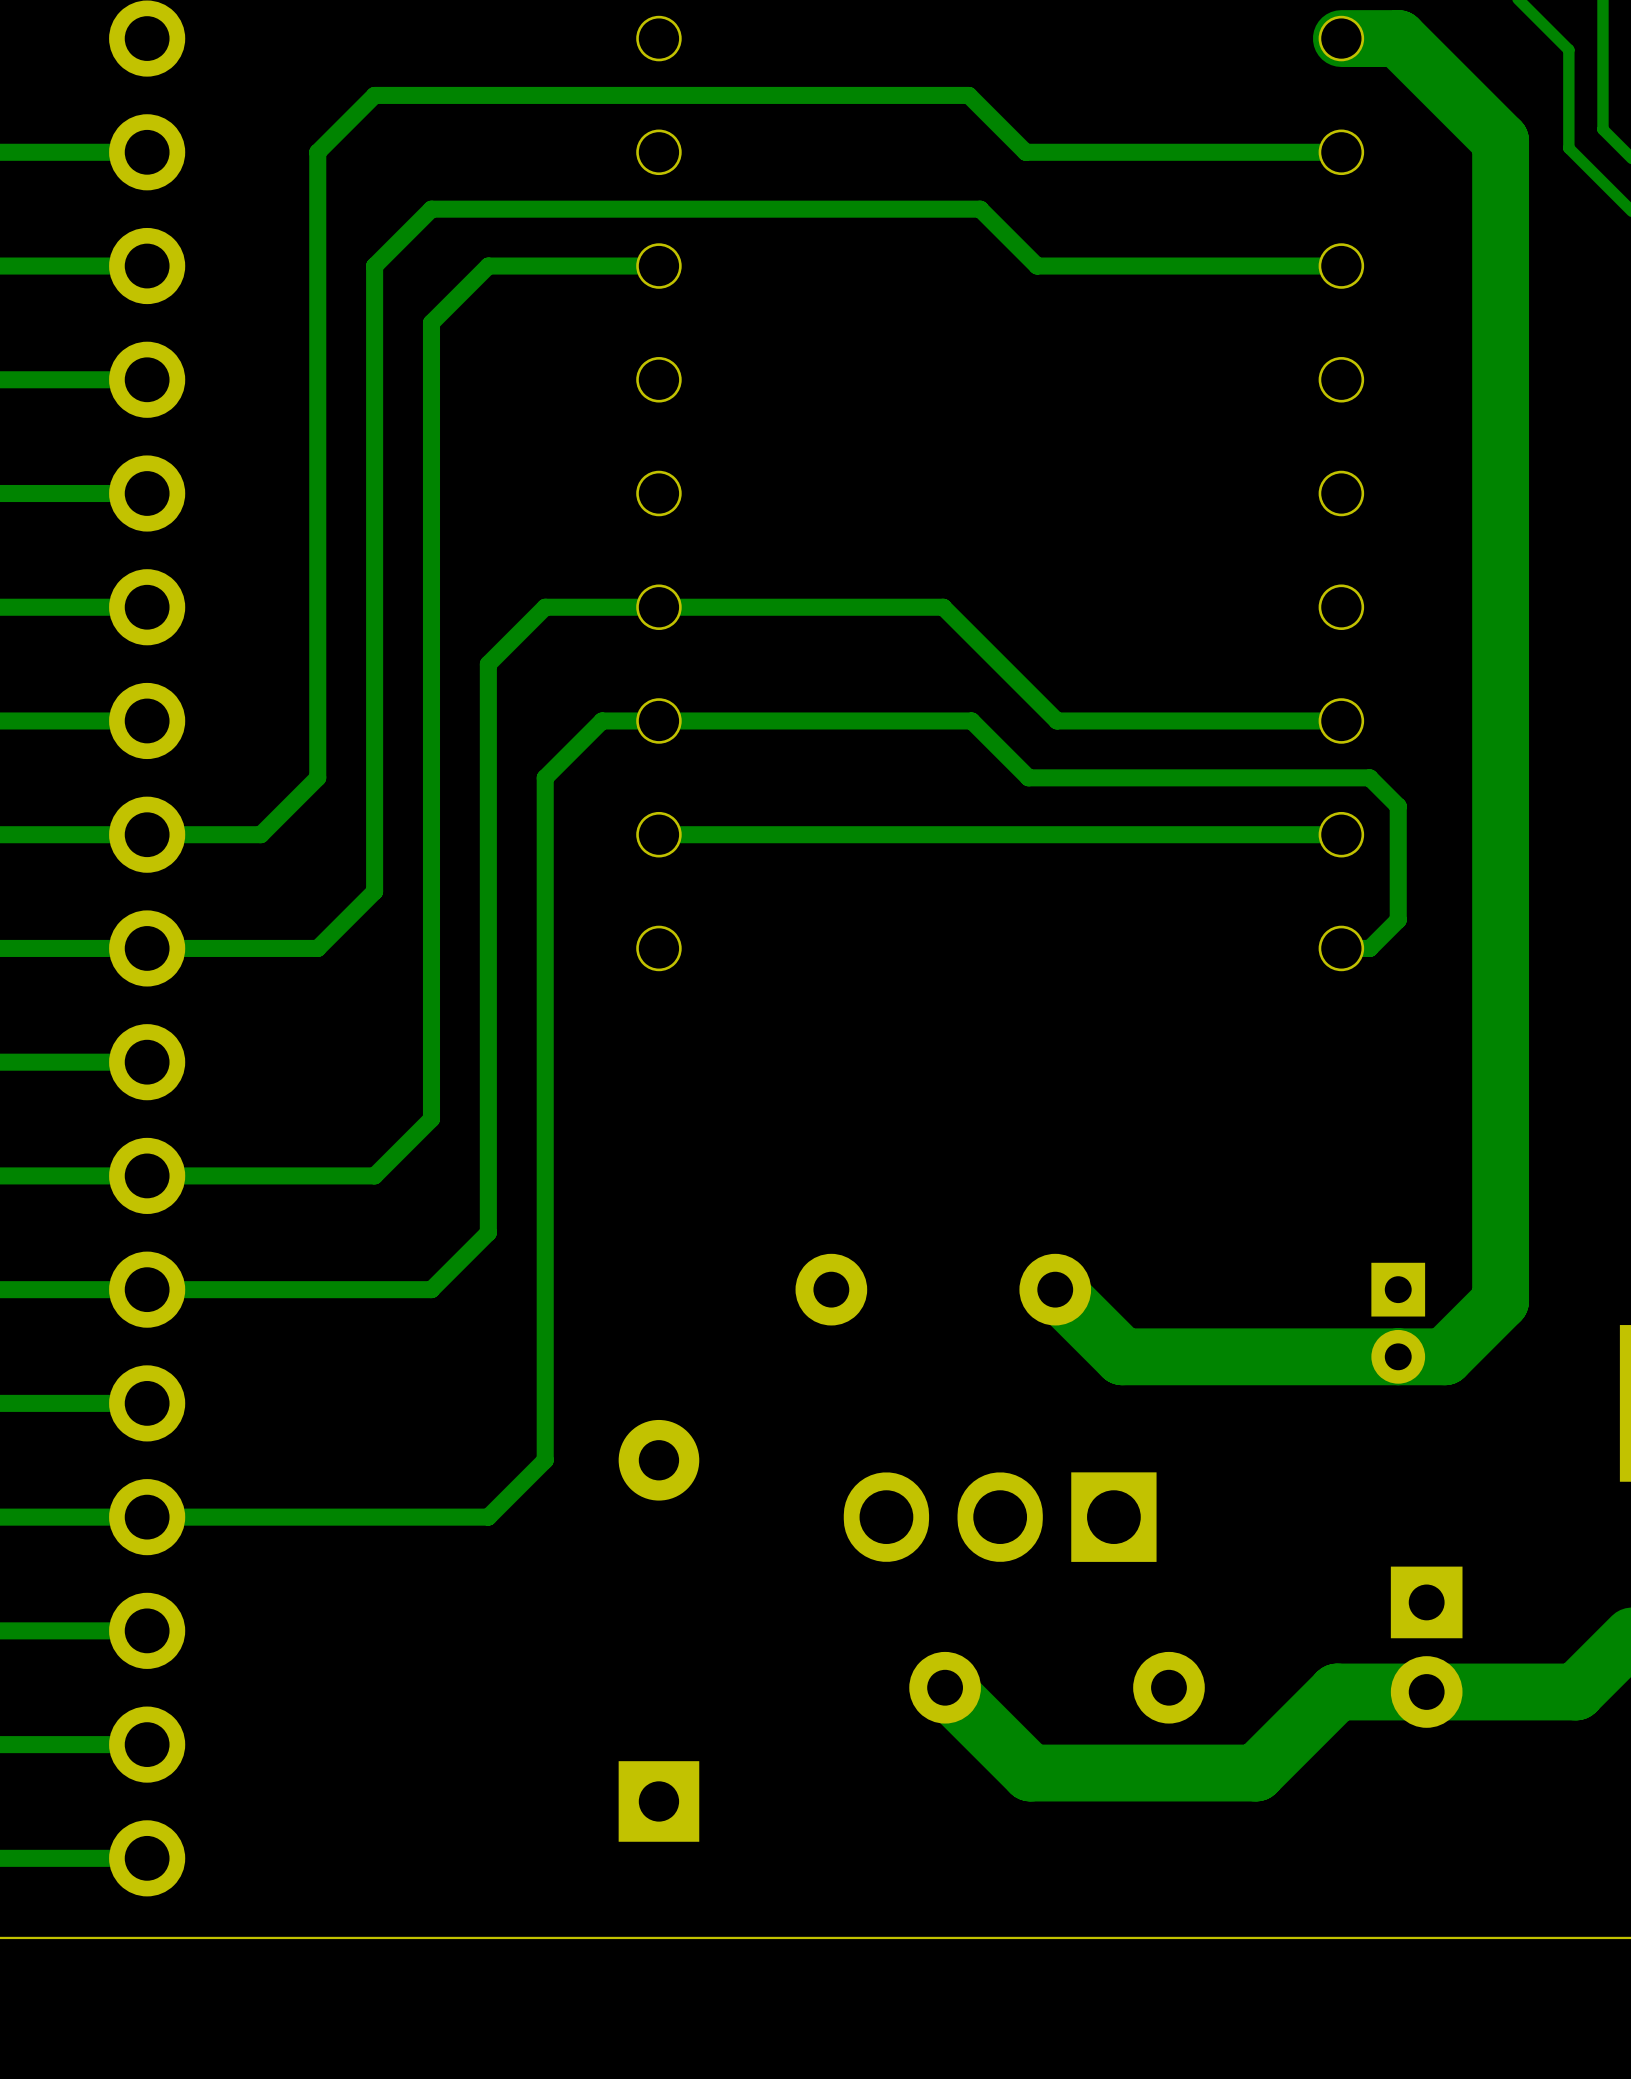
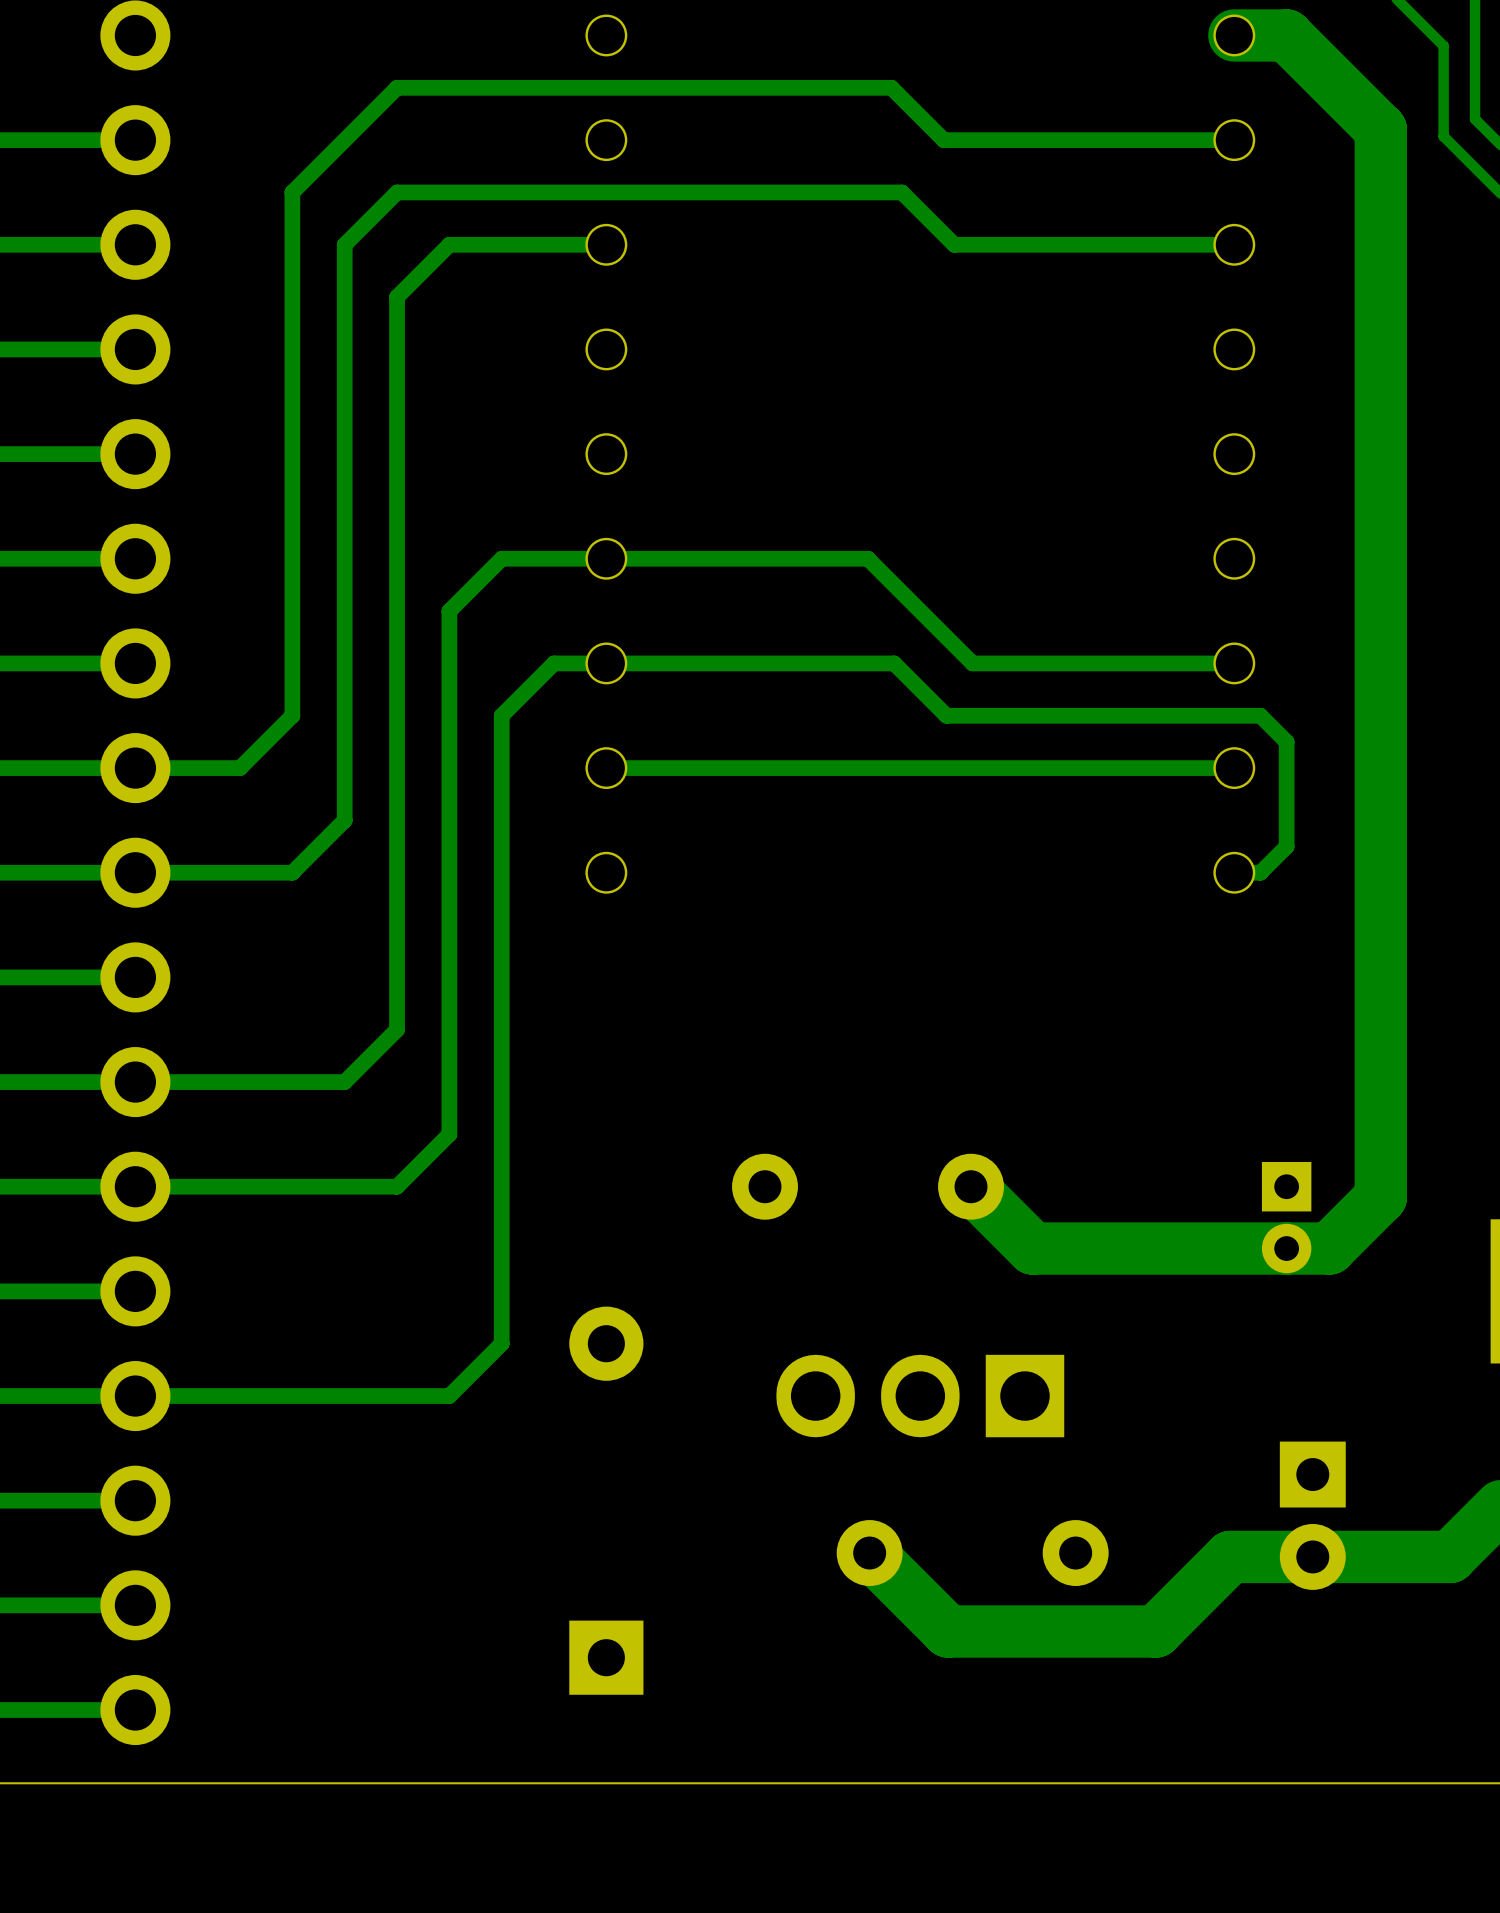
track: (431, 95) (374, 95) (317, 152) (317, 209) -> (397, 87) (292, 192)

